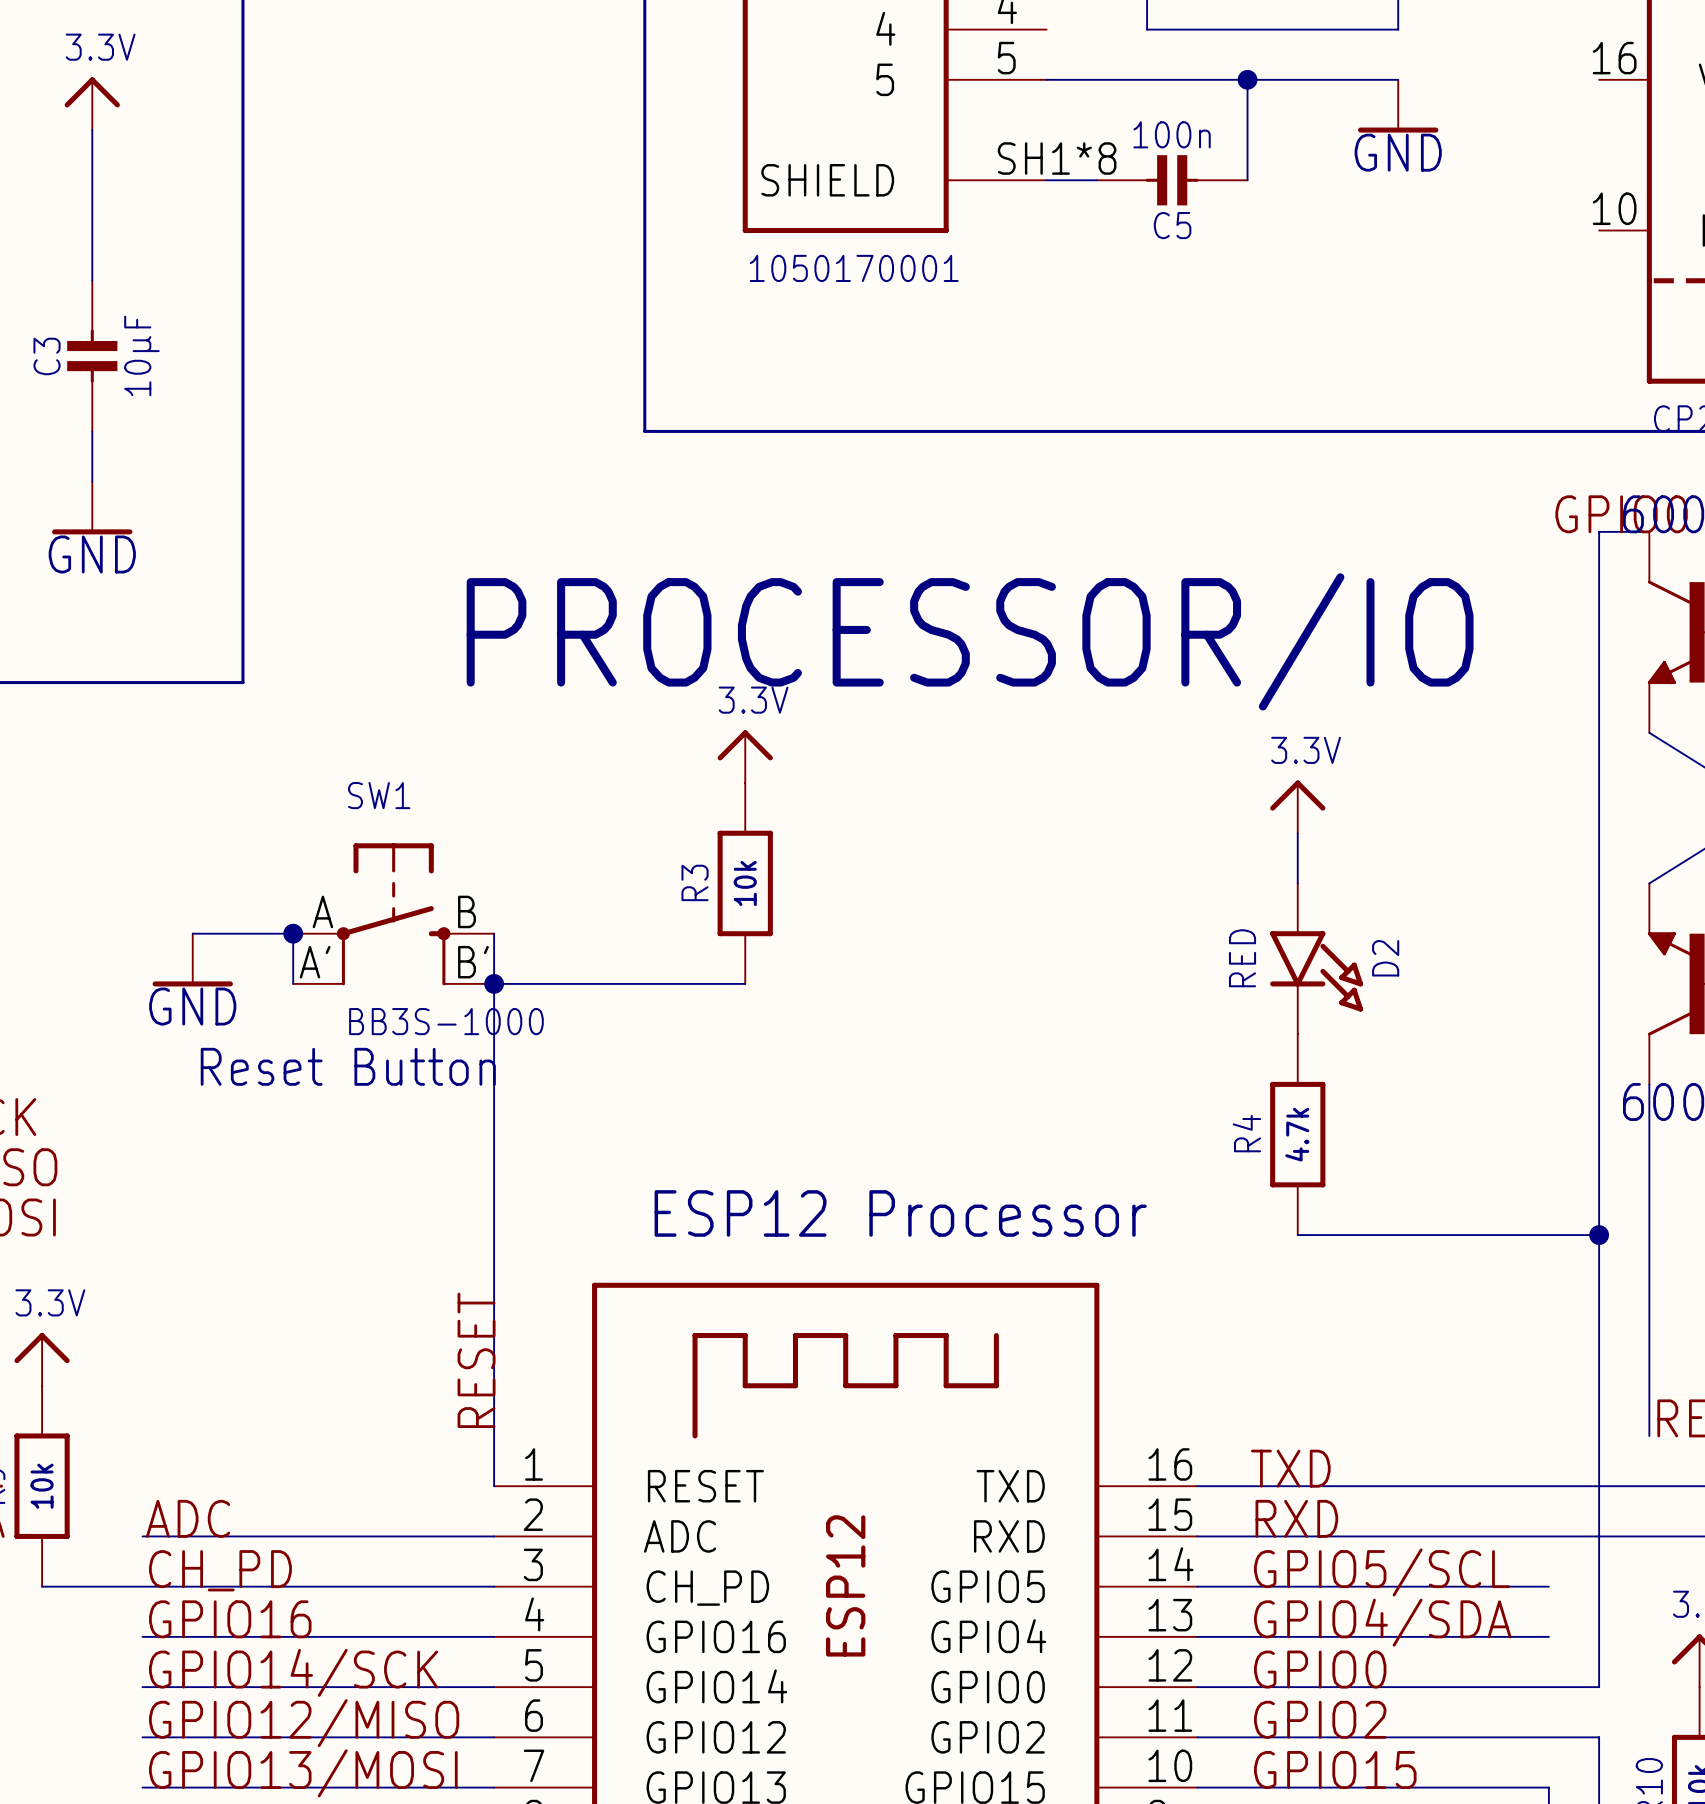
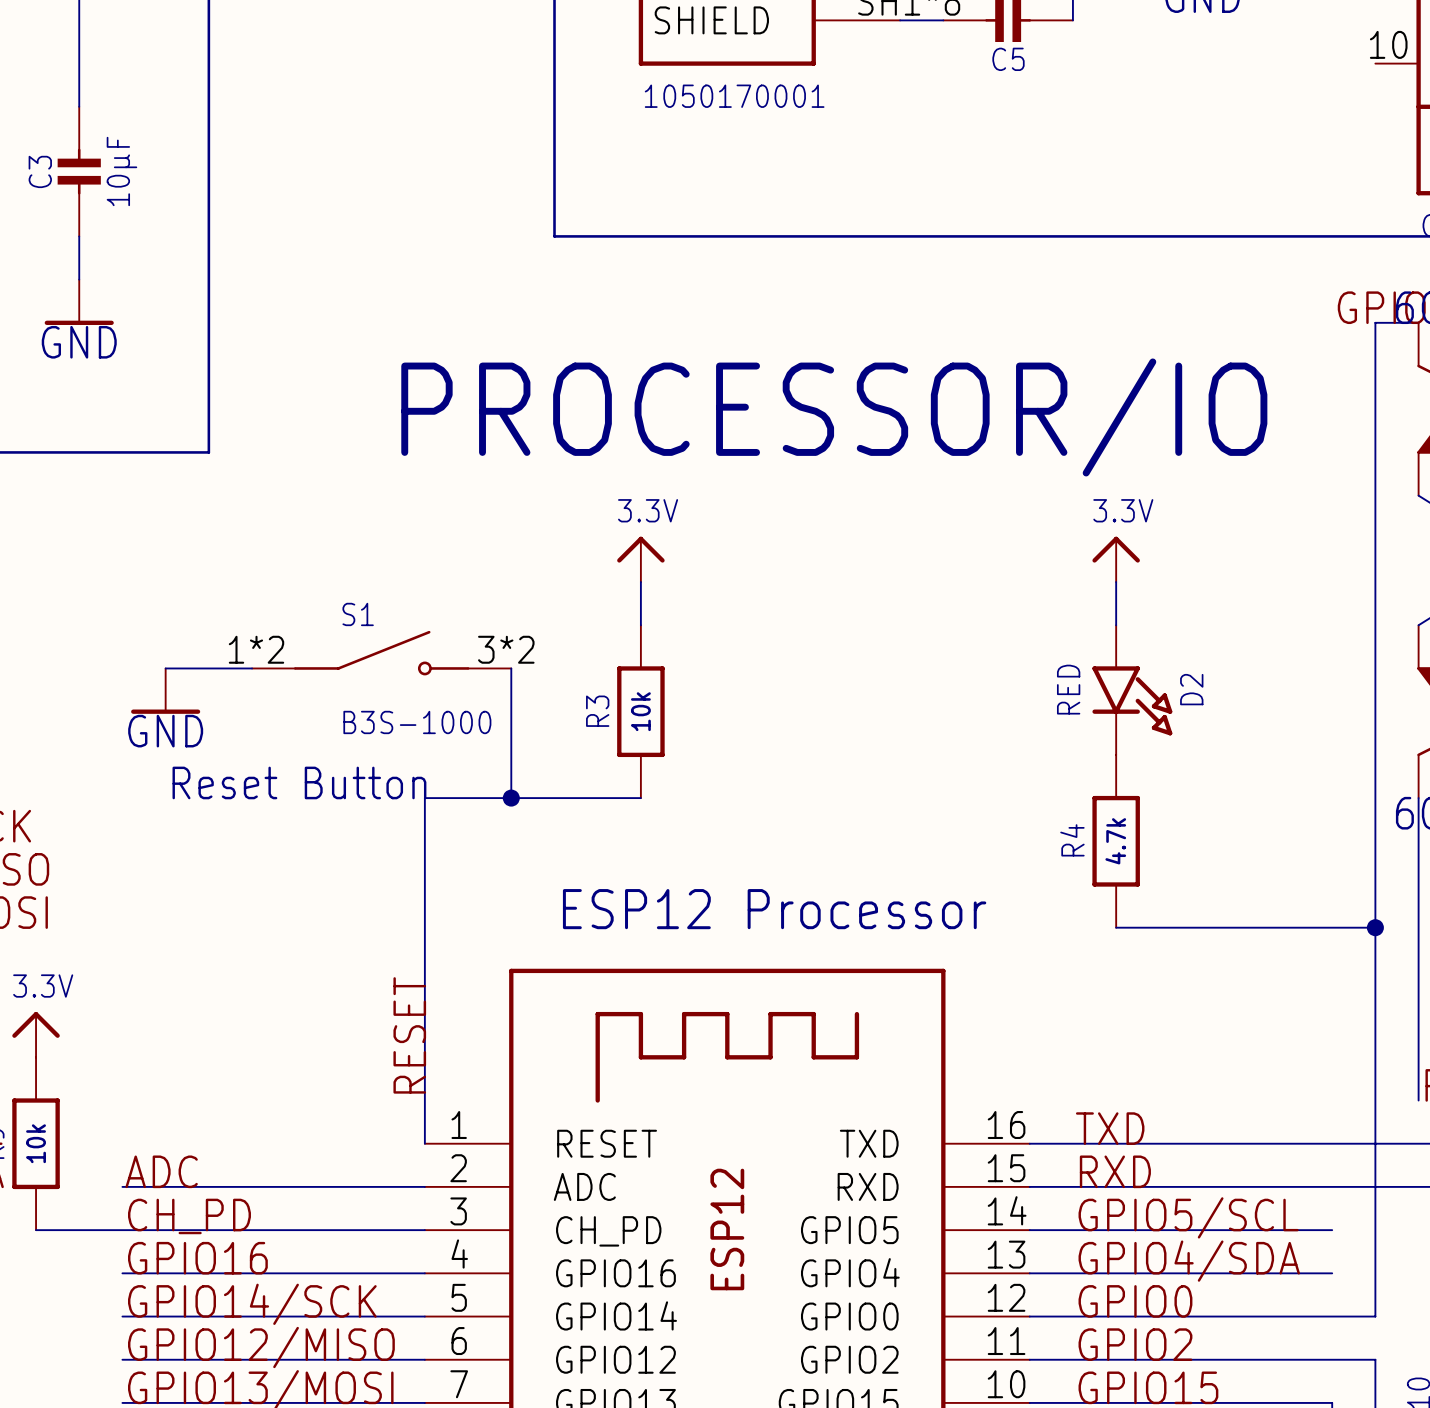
power symbol position: 3.3V (745, 756) -> 3.3V (640, 559)
R3 position: (745, 883) -> (640, 711)
SW1: BB3S-1000 (393, 914) -> none
S1: none -> B3S-1000 (381, 653)
wire: (293, 933) (293, 983) -> (640, 582) (640, 625)
junction: (293, 933) -> none
wire: (494, 933) (494, 1084) -> (640, 798) (424, 798)
wire: none -> (511, 668) (511, 798)
wire: (494, 983) (745, 983) -> none
junction: (494, 983) -> none
junction: none -> (511, 798)

